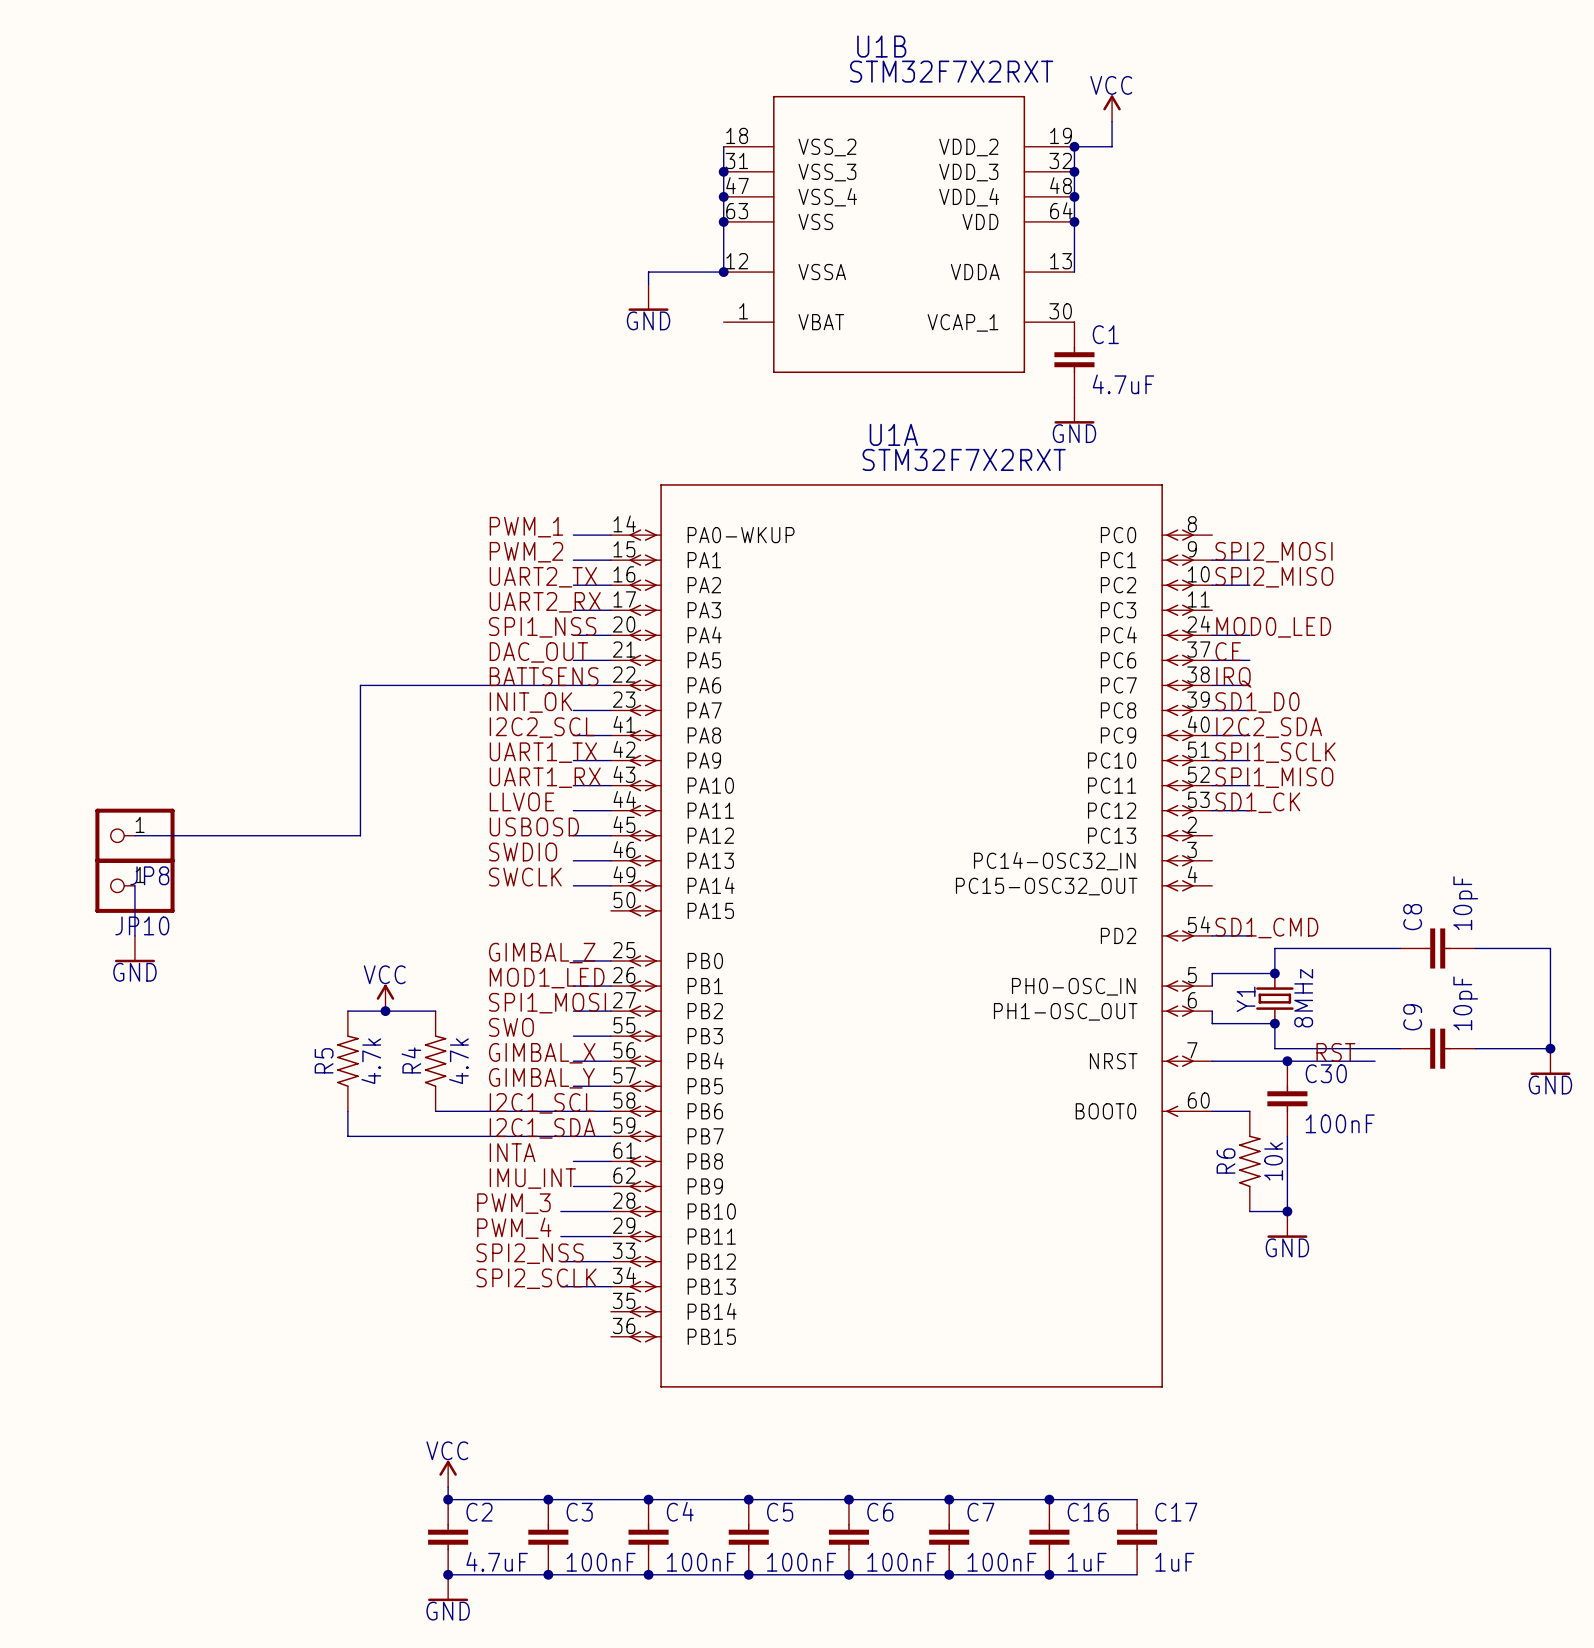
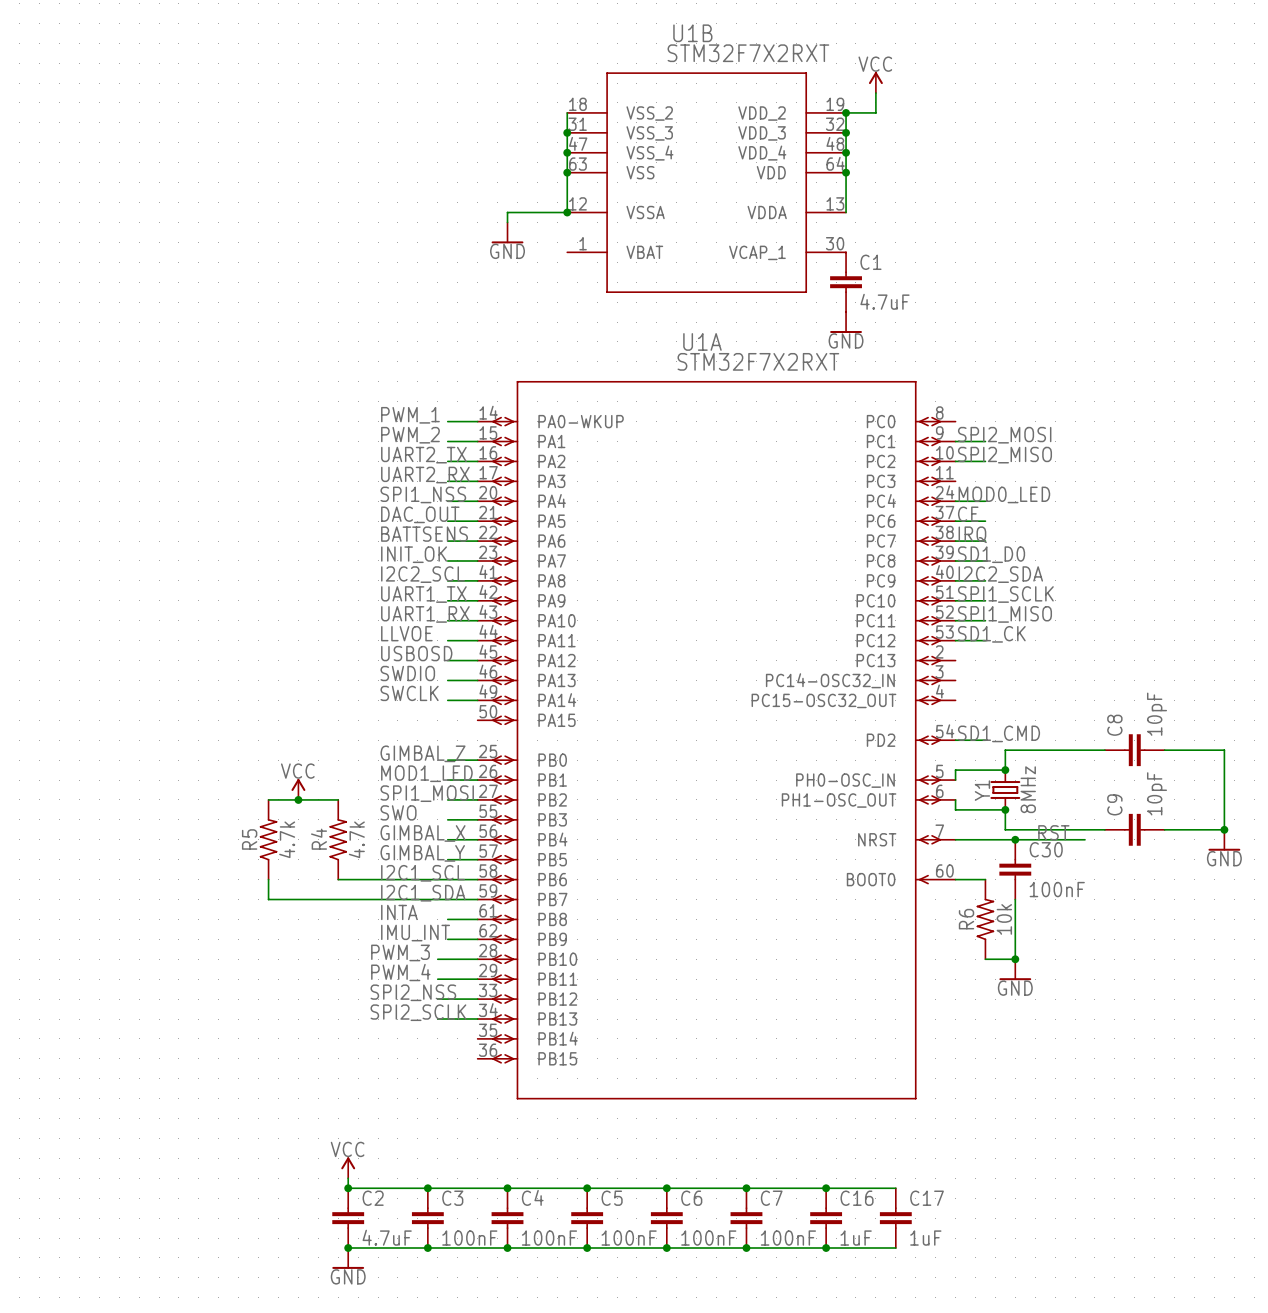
wire: (573, 685) (360, 685) (360, 835) (134, 835) -> none
JP8: (134, 835) -> none
wire: (134, 885) (134, 935) -> none
JP10: (134, 885) -> none
power symbol: GND (134, 949) -> none

